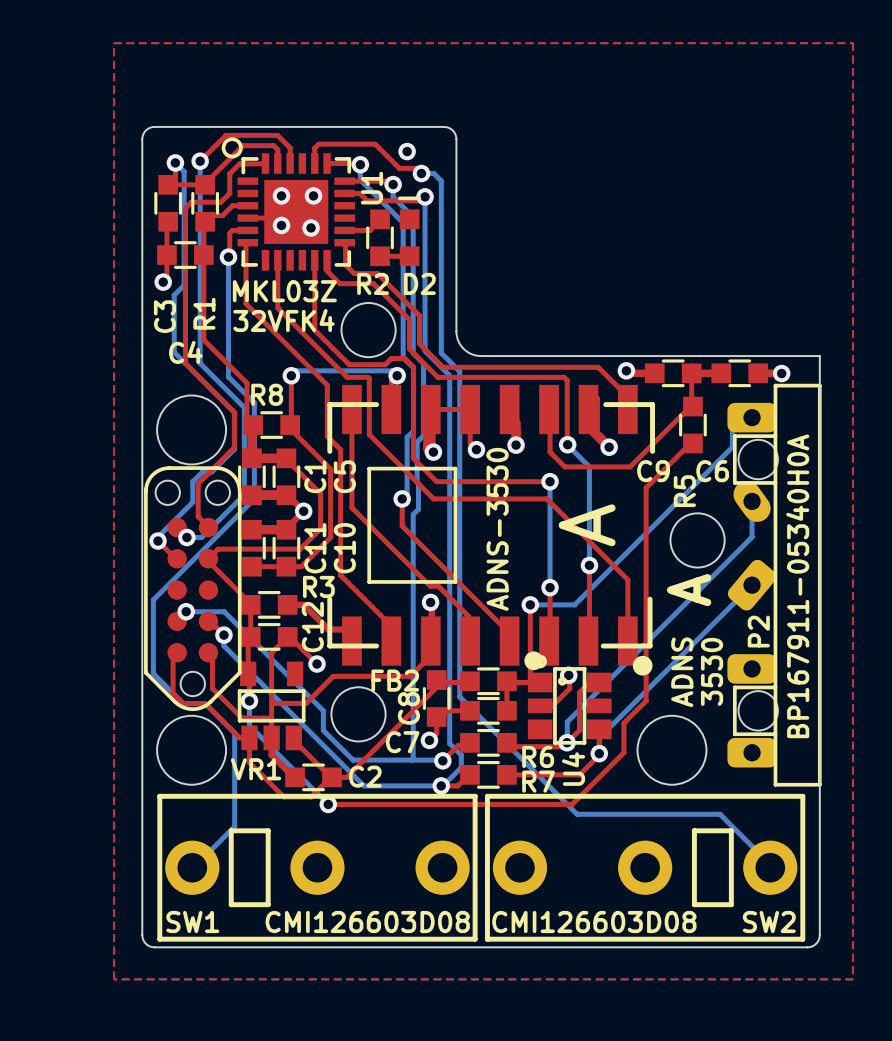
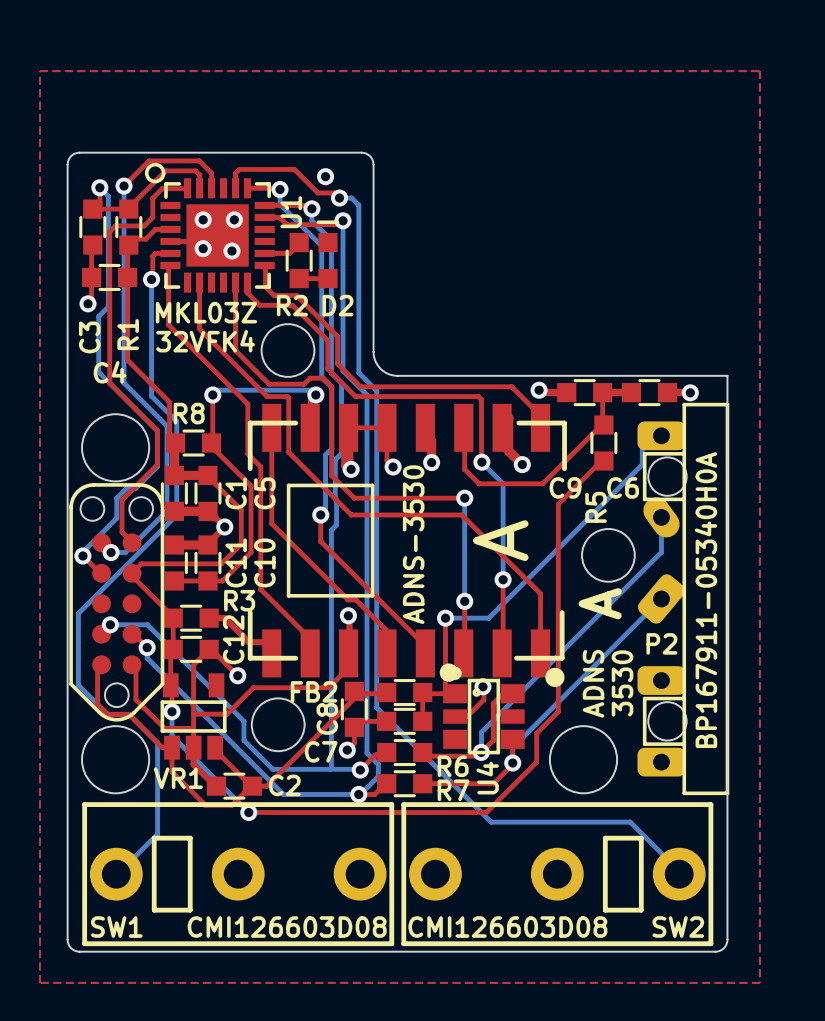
P2 name rotation: 0° (758, 631) -> 90° clockwise (661, 643)

